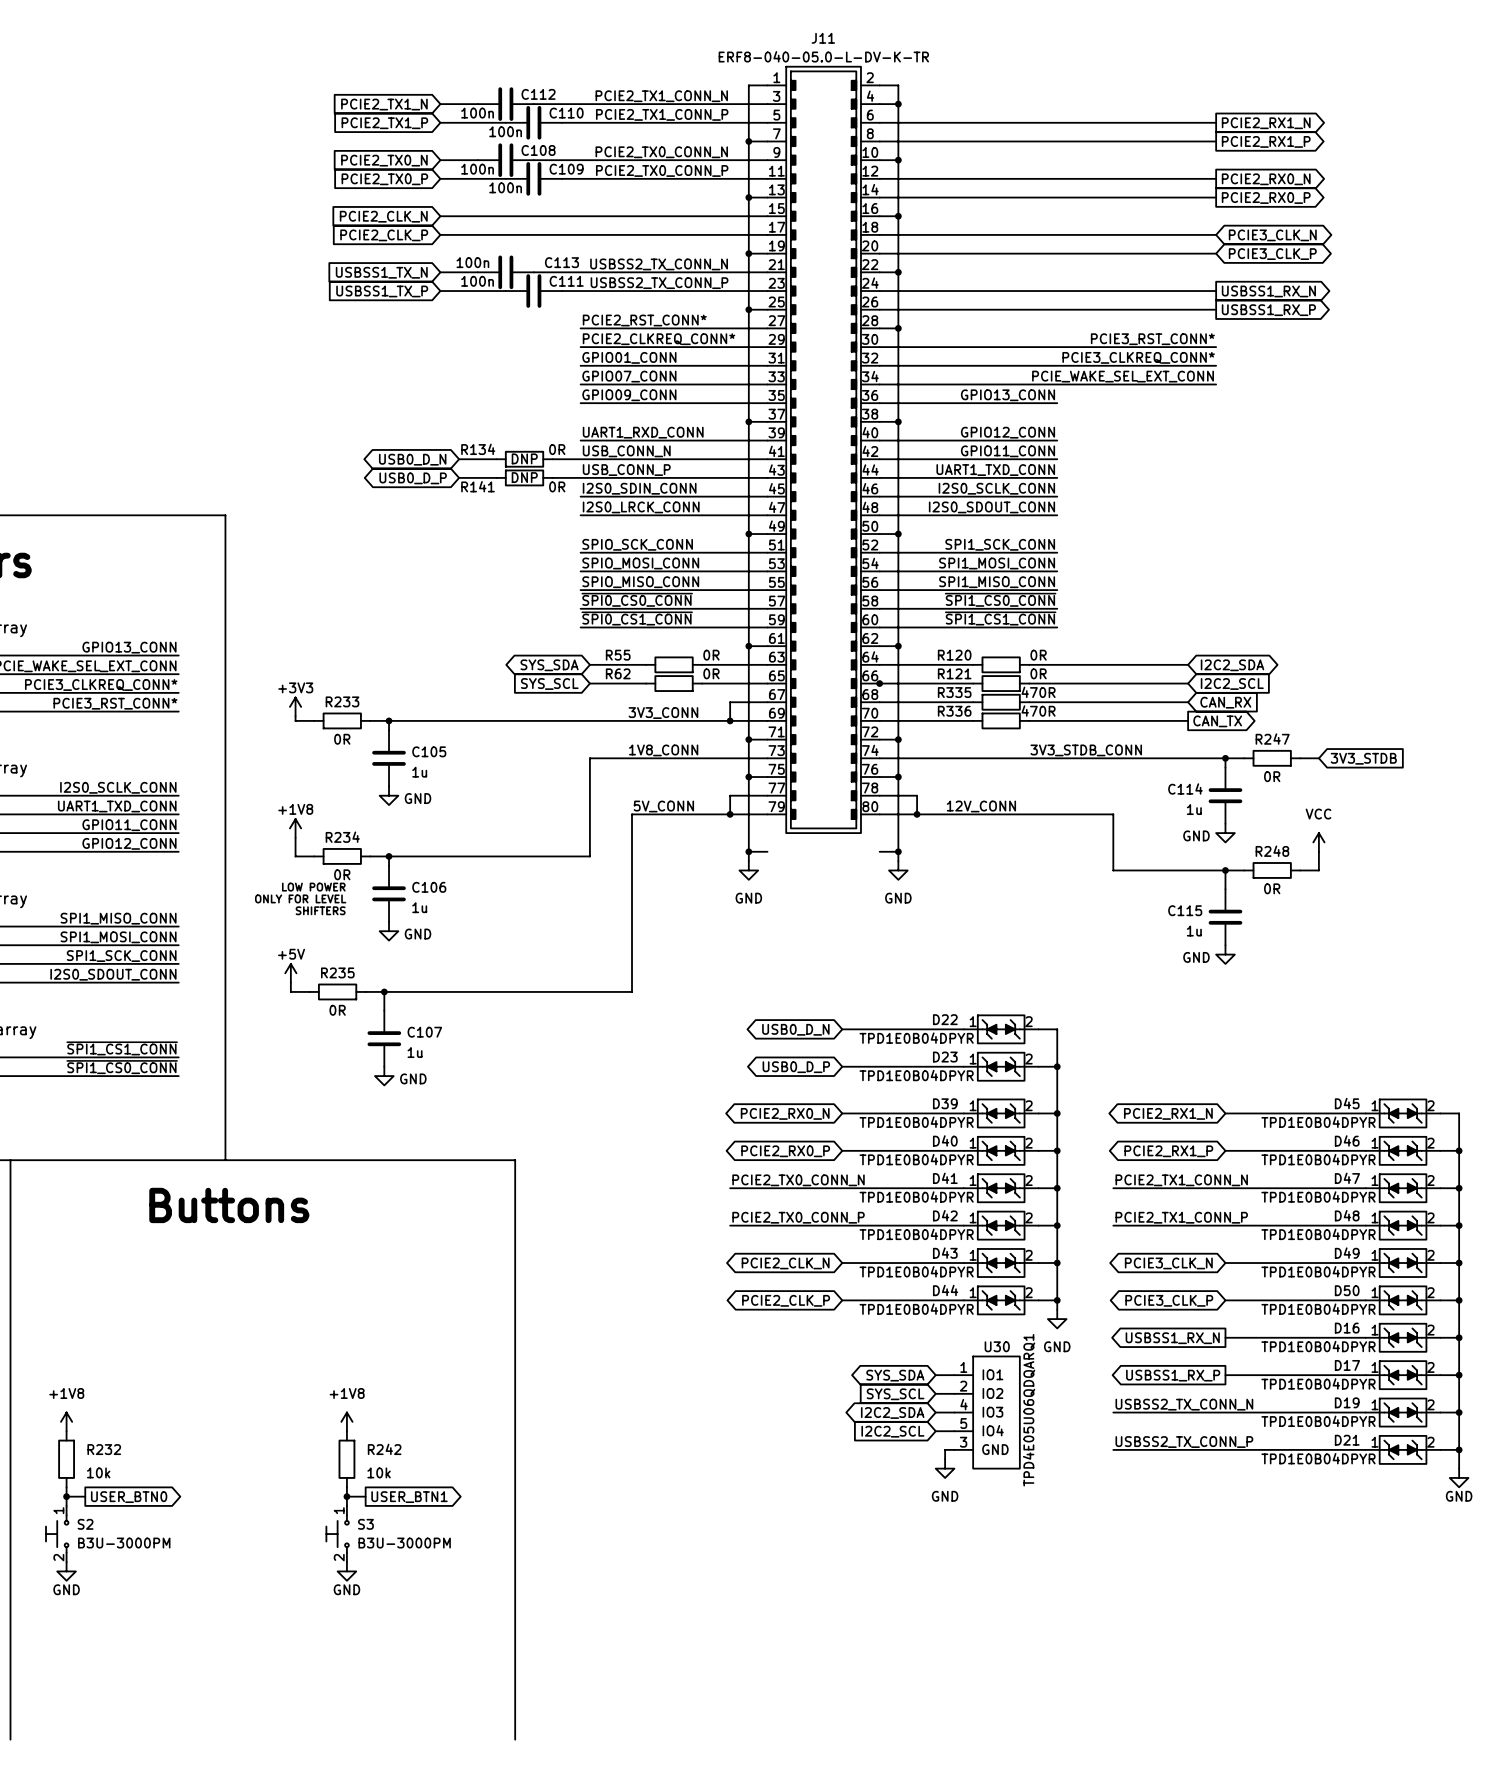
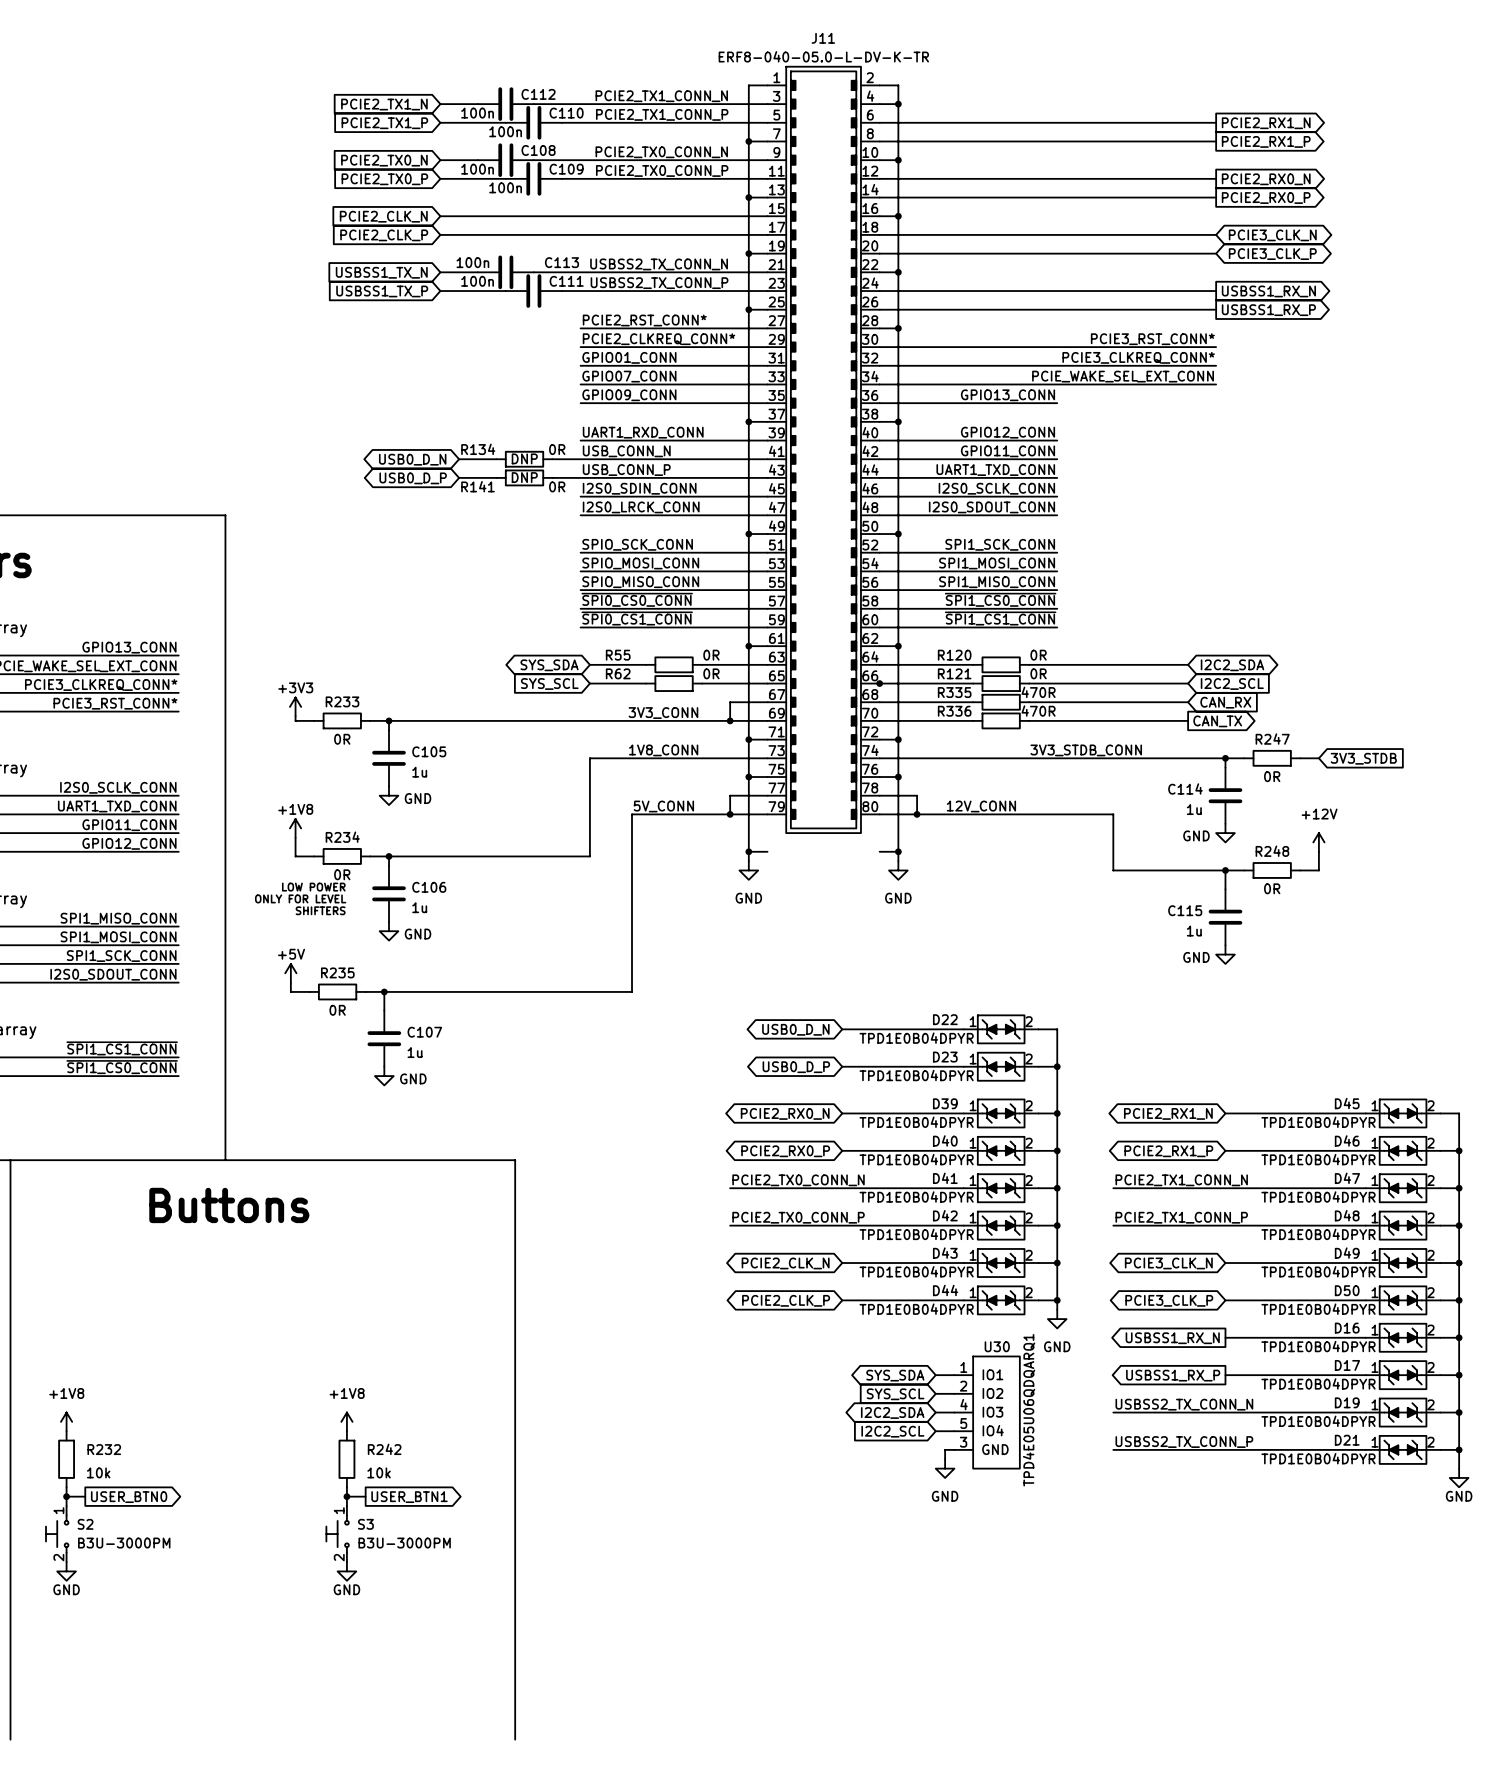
power symbol: VCC (1318, 842) -> +12V (1318, 842)

